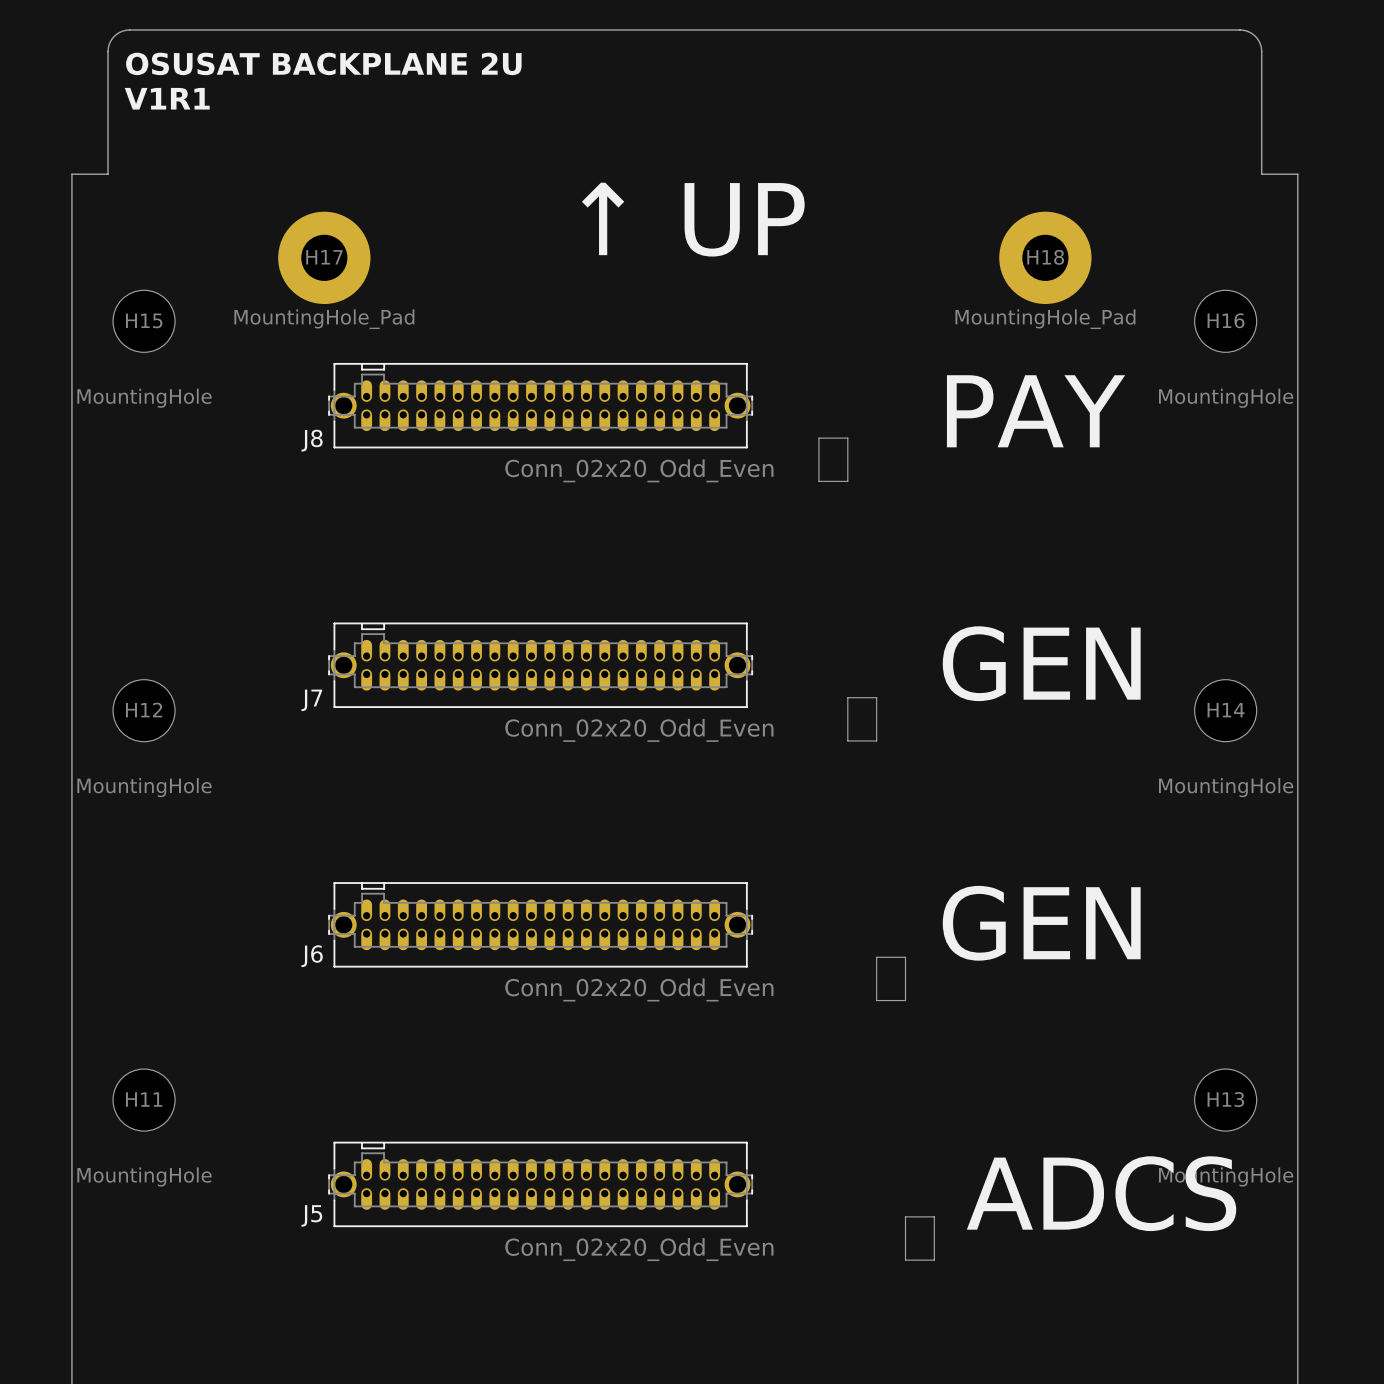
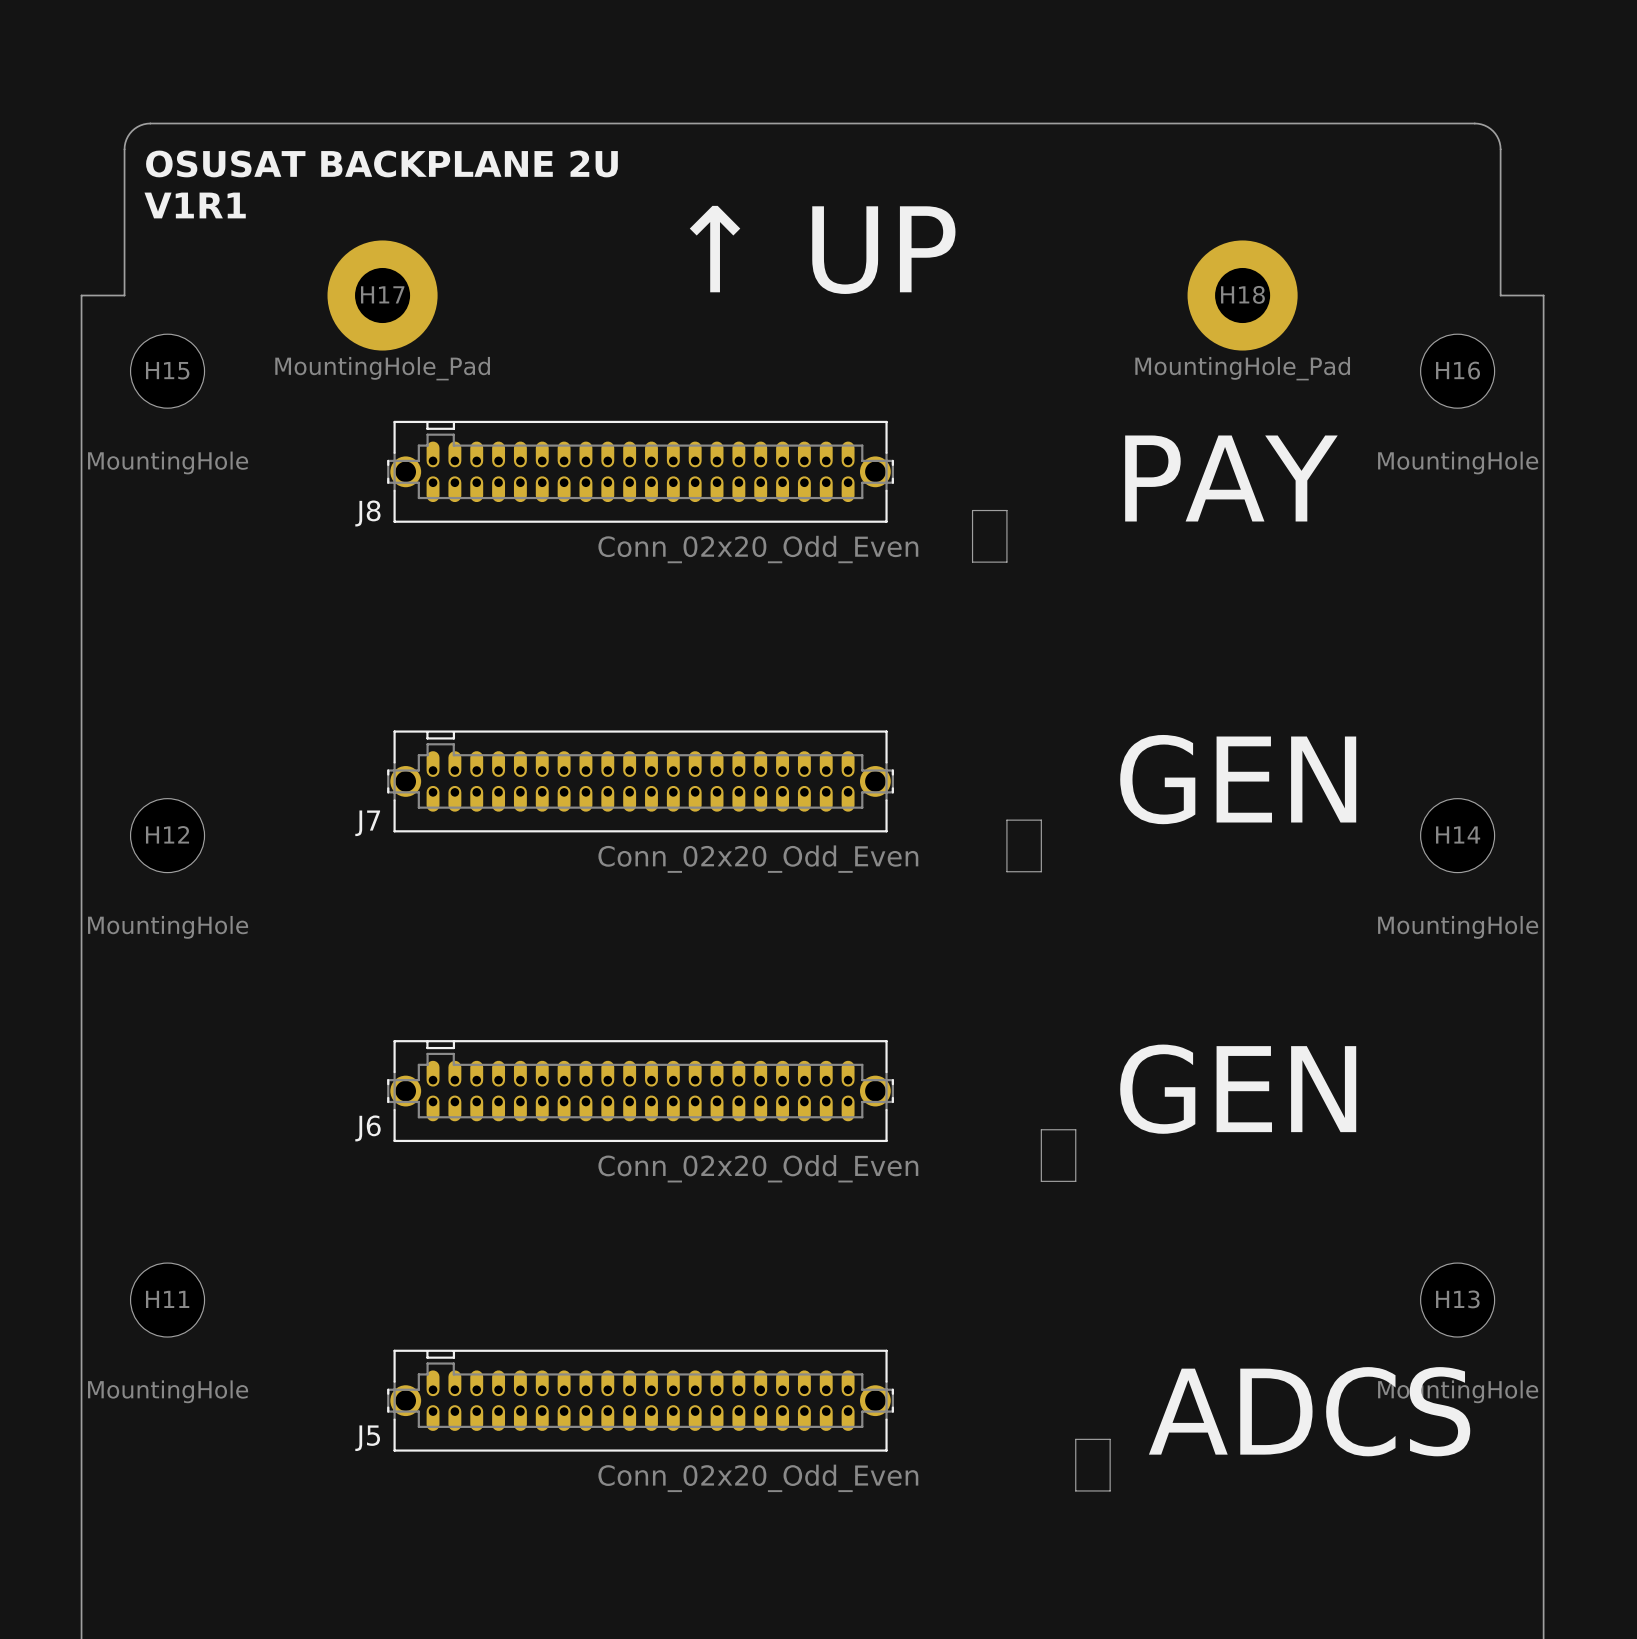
text position: OSUSAT BACKPLANE 2U (323, 63) -> OSUSAT BACKPLANE 2U (381, 163)
text position: V1R1 (167, 98) -> V1R1 (195, 205)
board edge: (108, 135) (108, 46) (116, 34) (129, 30) (1242, 30) (1255, 36) (1261, 48) (1261, 135) -> (124, 149) (126, 139) (132, 131) (140, 125) (150, 123) (1474, 123) (1484, 125) (1493, 131) (1498, 139) (1500, 149)
board edge: (108, 174) (71, 174) (71, 257) -> (124, 195) (124, 295) (81, 295)
board edge: (1261, 174) (1297, 174) (1297, 257) -> (1500, 195) (1500, 295) (1543, 295)

